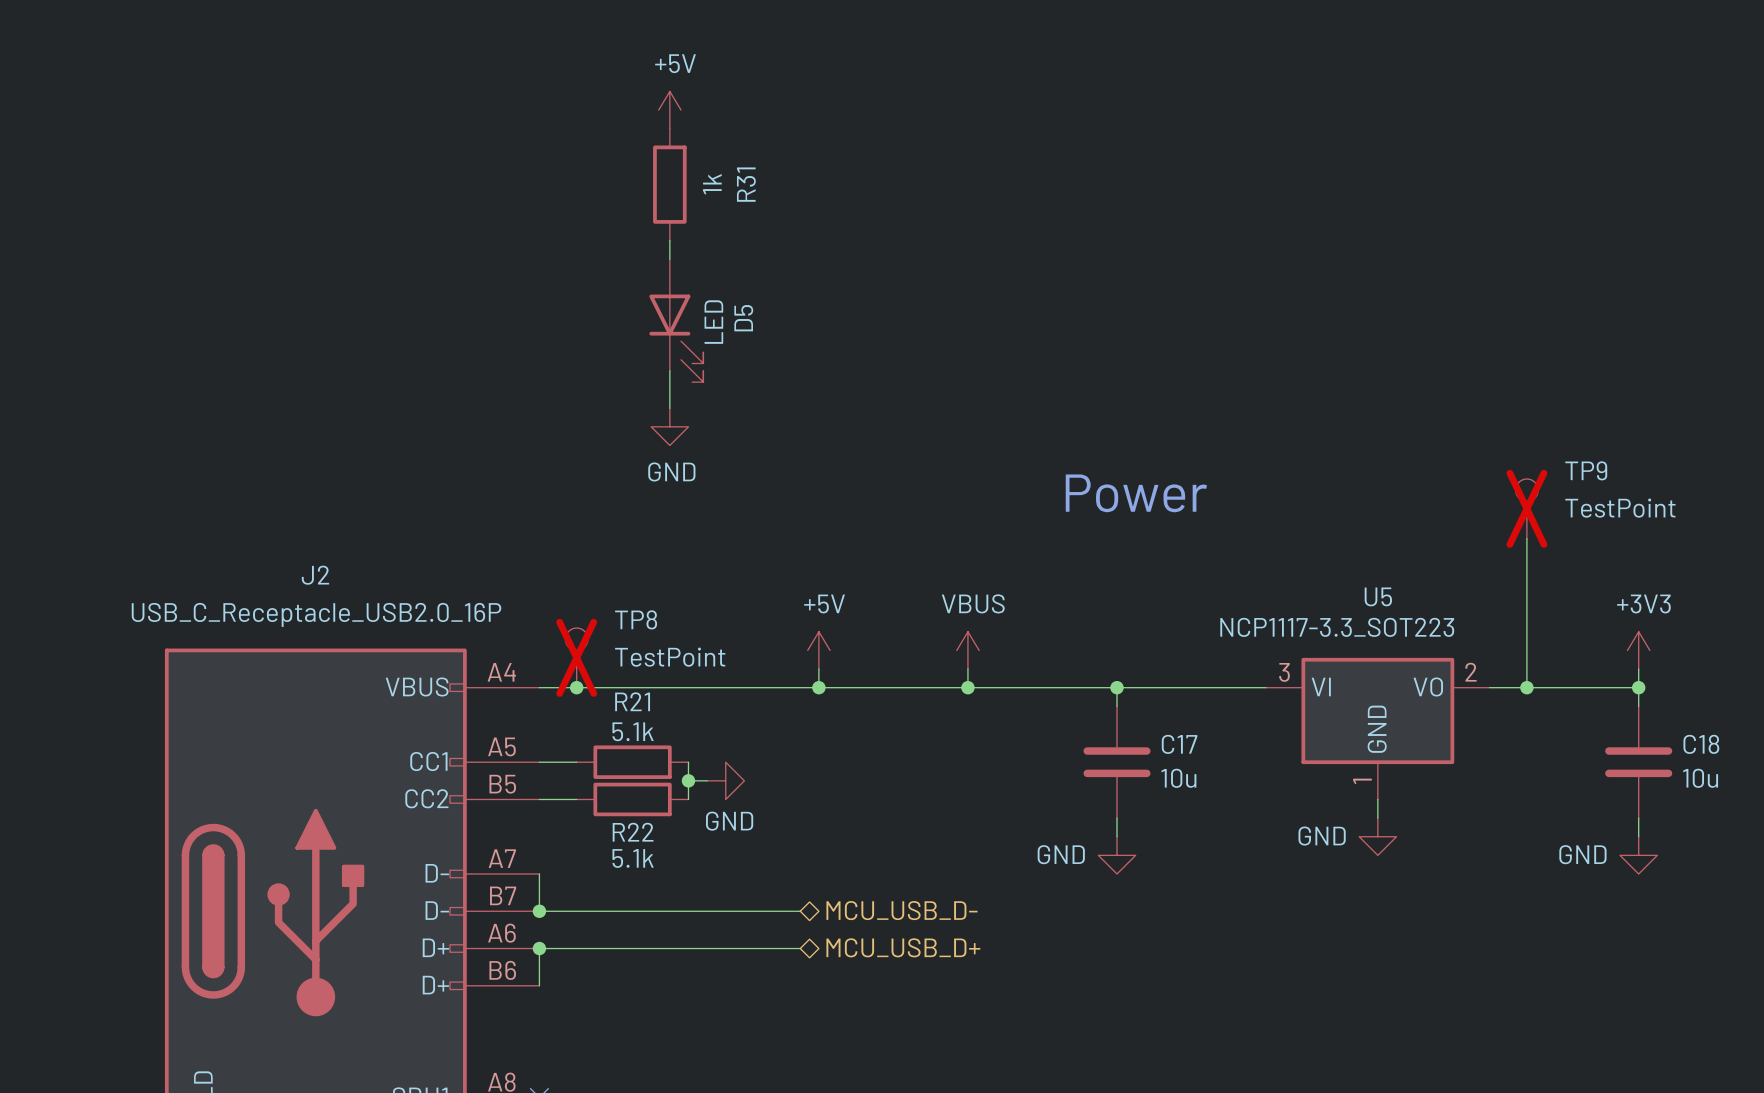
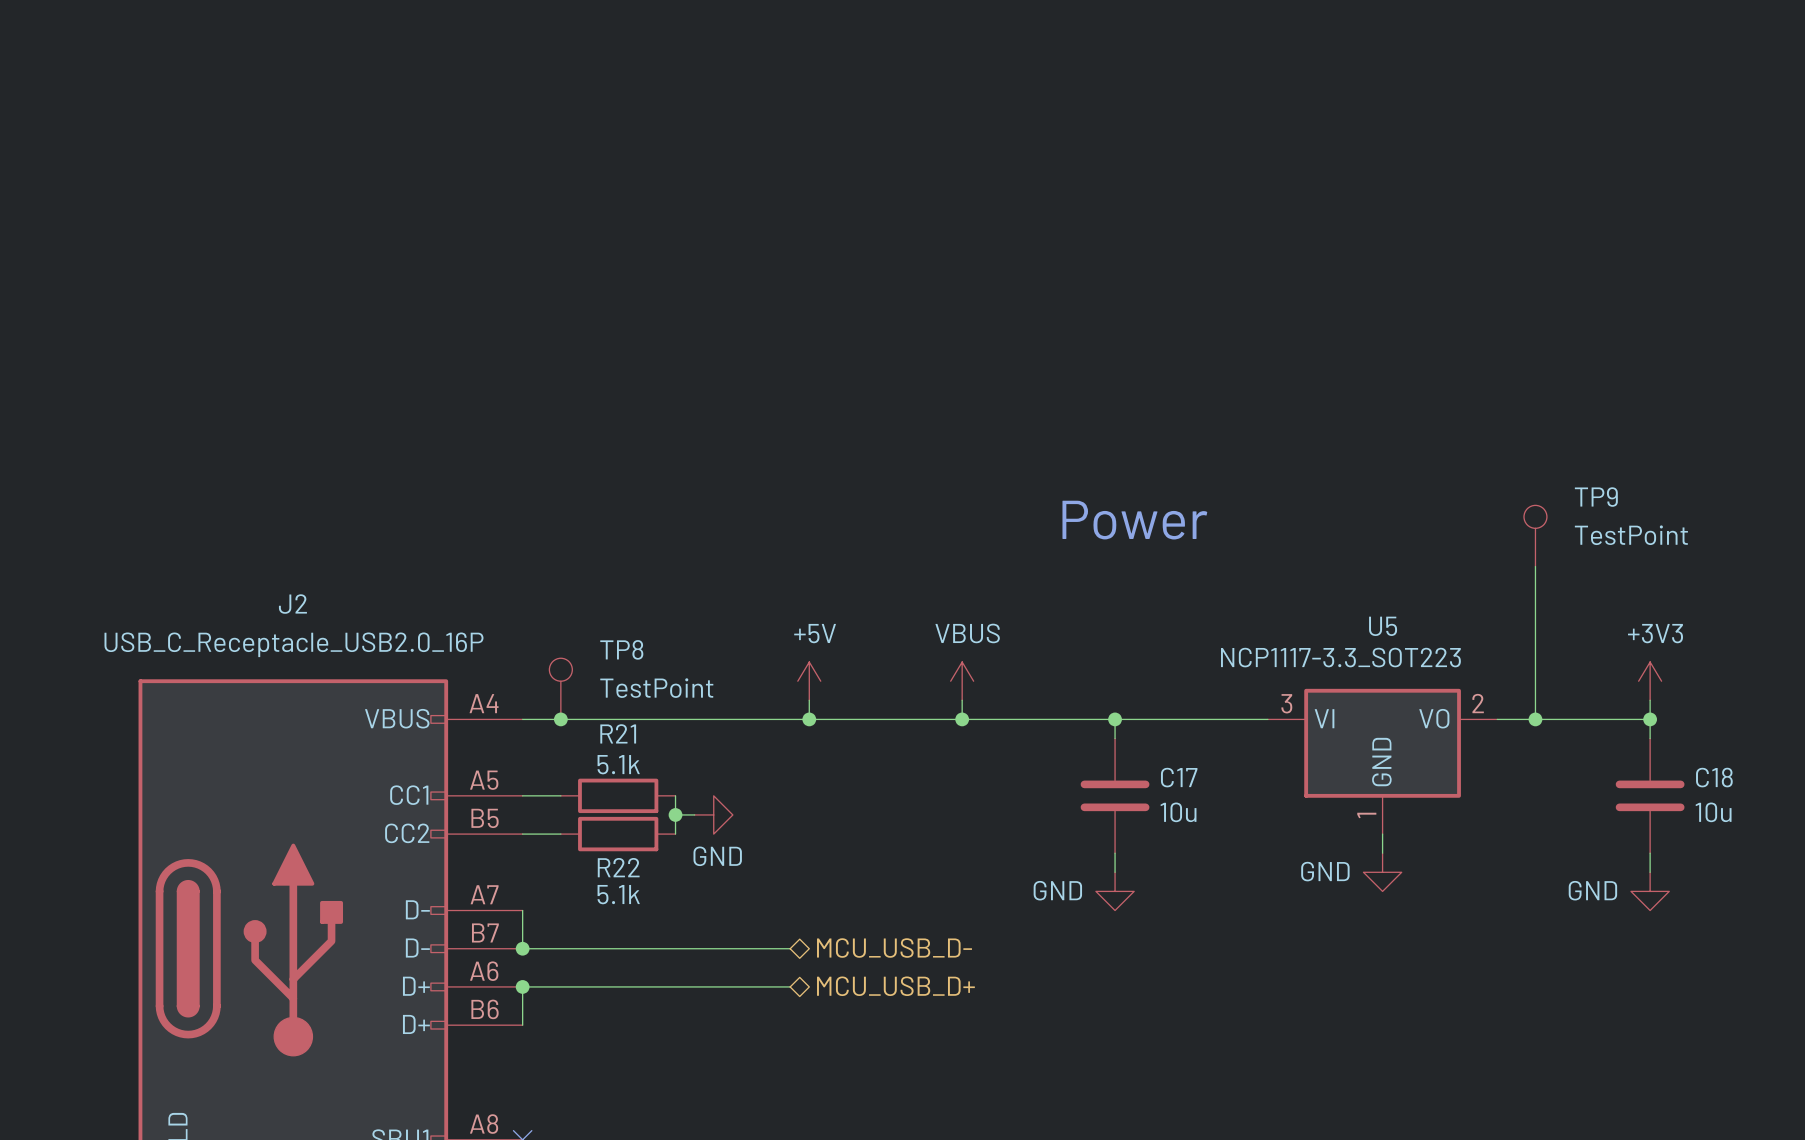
power symbol: +5V (669, 110) -> none
R31: 1k (669, 184) -> none
wire: (669, 240) (669, 259) -> none
D5: LED (676, 320) -> none
wire: (669, 370) (669, 408) -> none
power symbol: GND (669, 426) -> none
TP9 do-not-place cross: (1526, 508) -> none
TP8 do-not-place cross: (576, 657) -> none

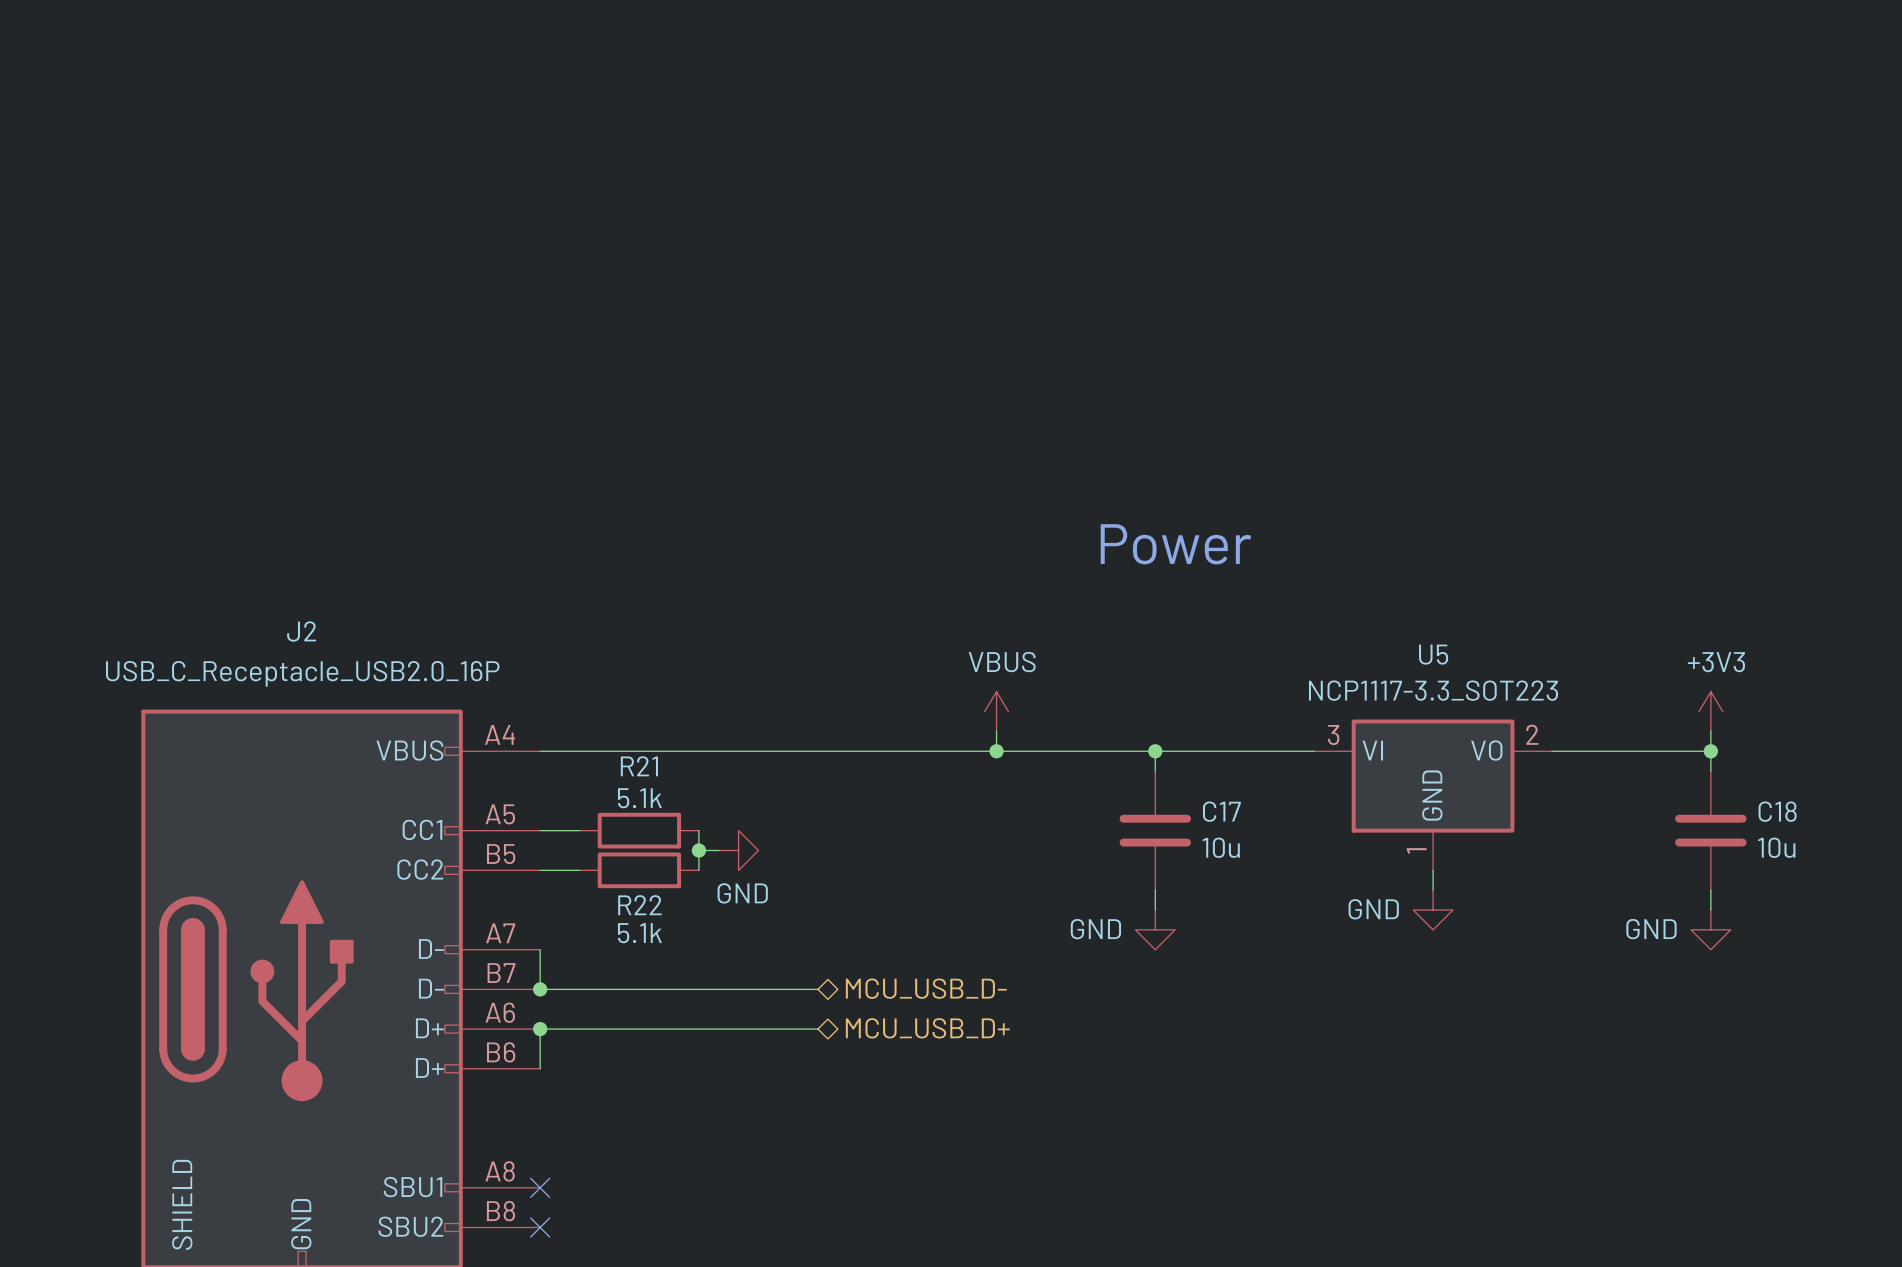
TP9: TestPoint (1535, 535) -> none
wire: (1535, 566) (1535, 719) -> none
U5 value position: NCP1117-3.3_SOT223 (1340, 657) -> NCP1117-3.3_SOT223 (1433, 690)
power symbol: +5V (809, 681) -> none
TP8: TestPoint (560, 688) -> none
wire: (809, 700) (809, 719) -> none
junction: (560, 719) -> none
junction: (809, 719) -> none
junction: (1535, 719) -> none

